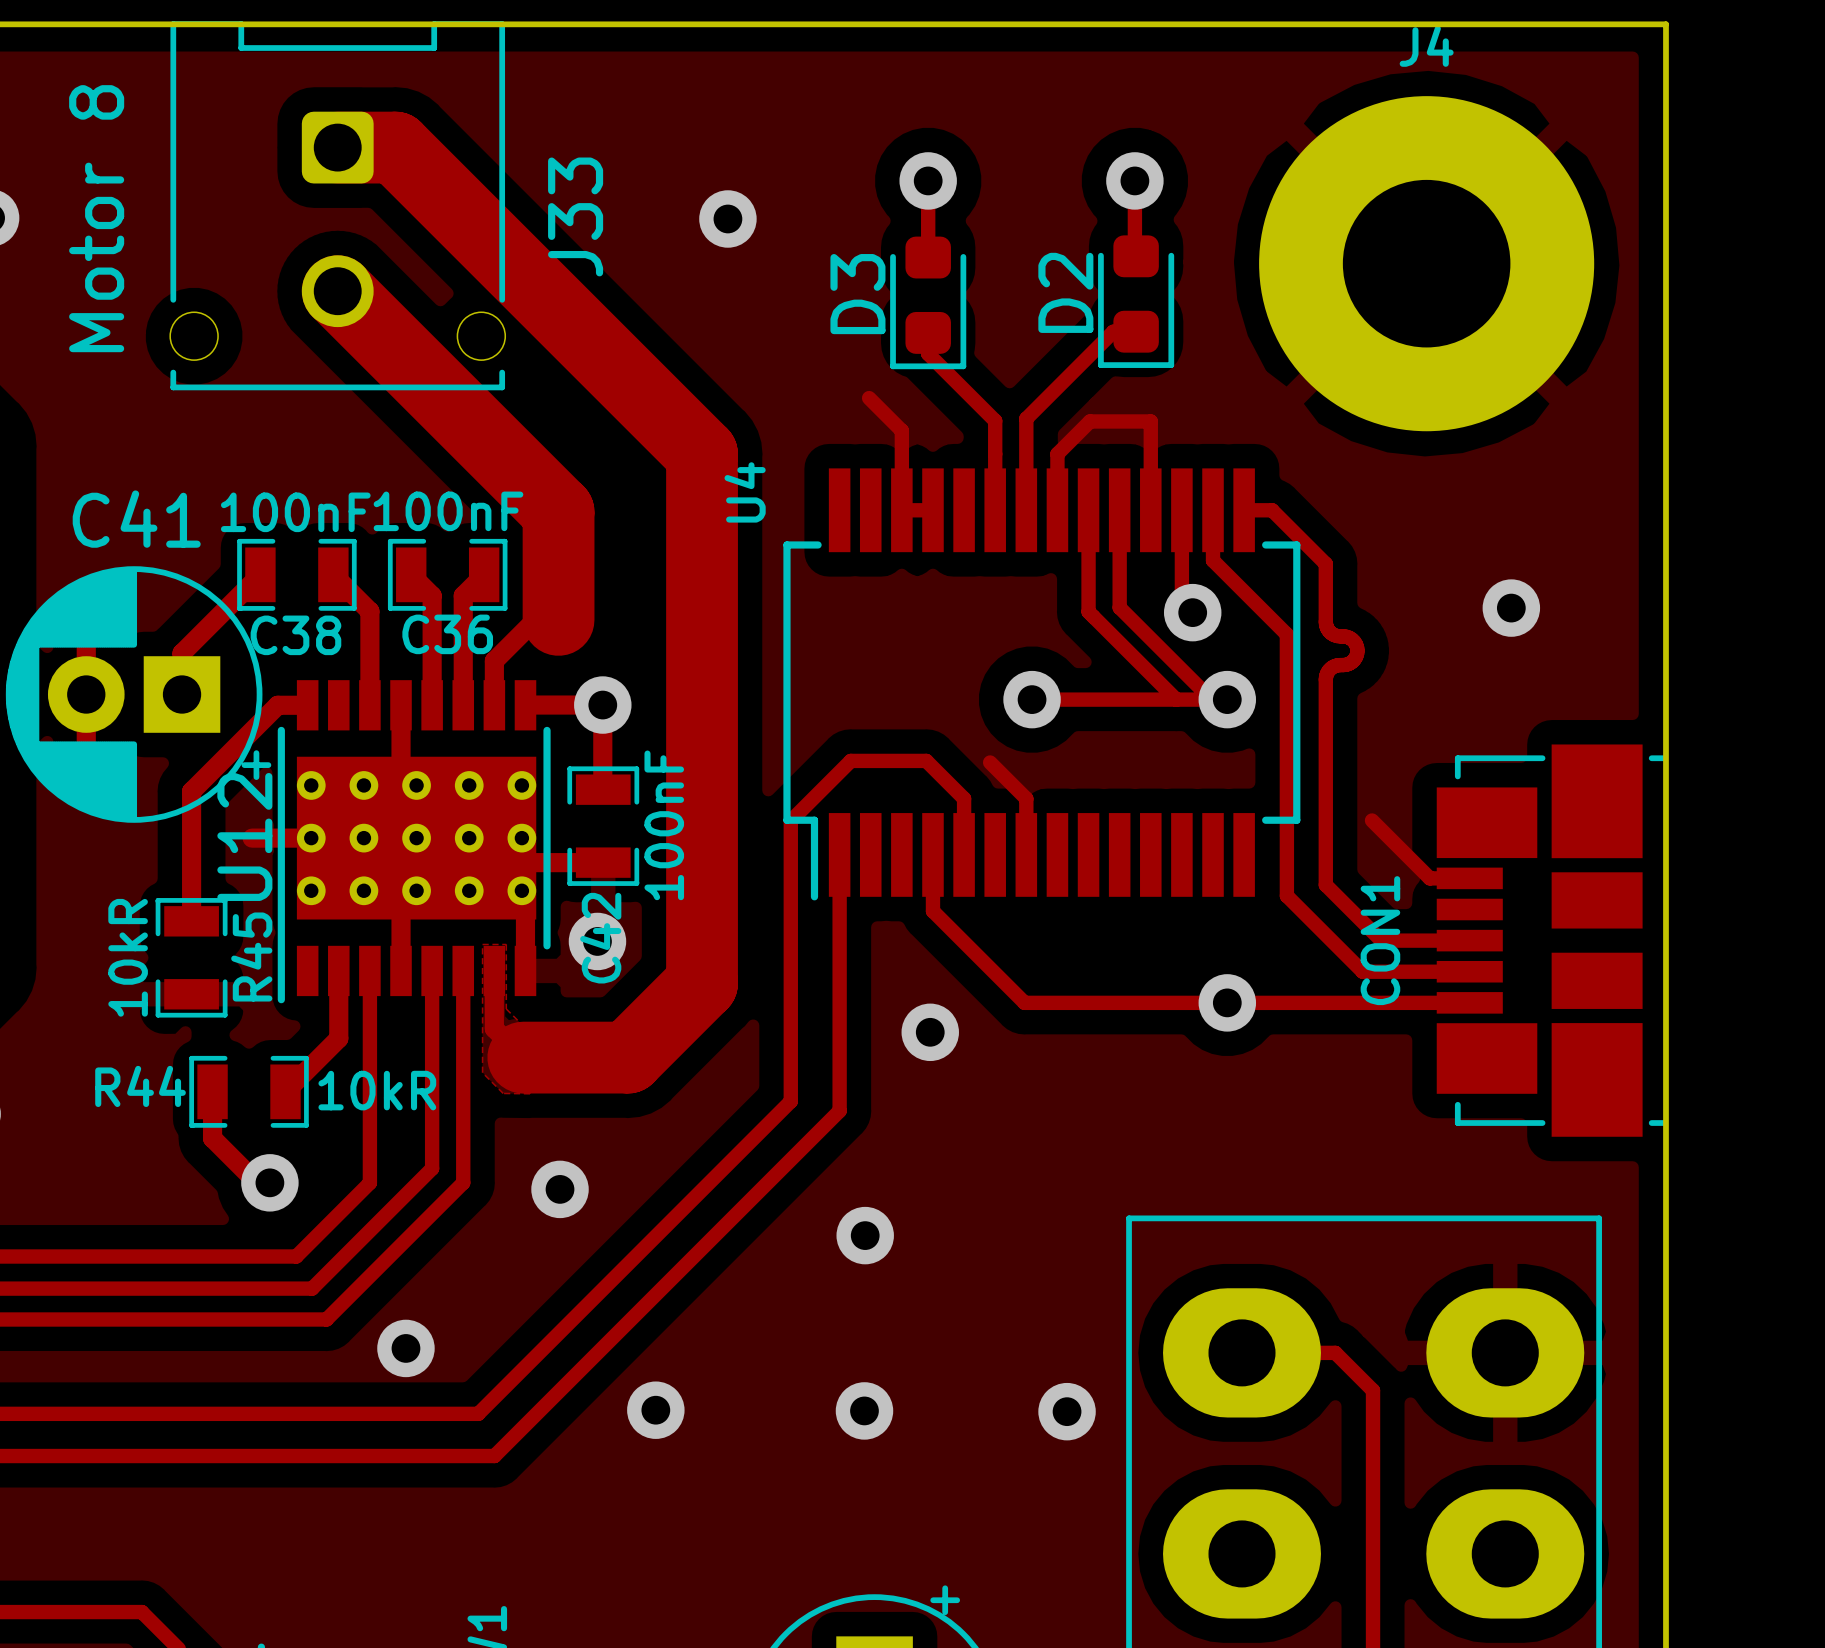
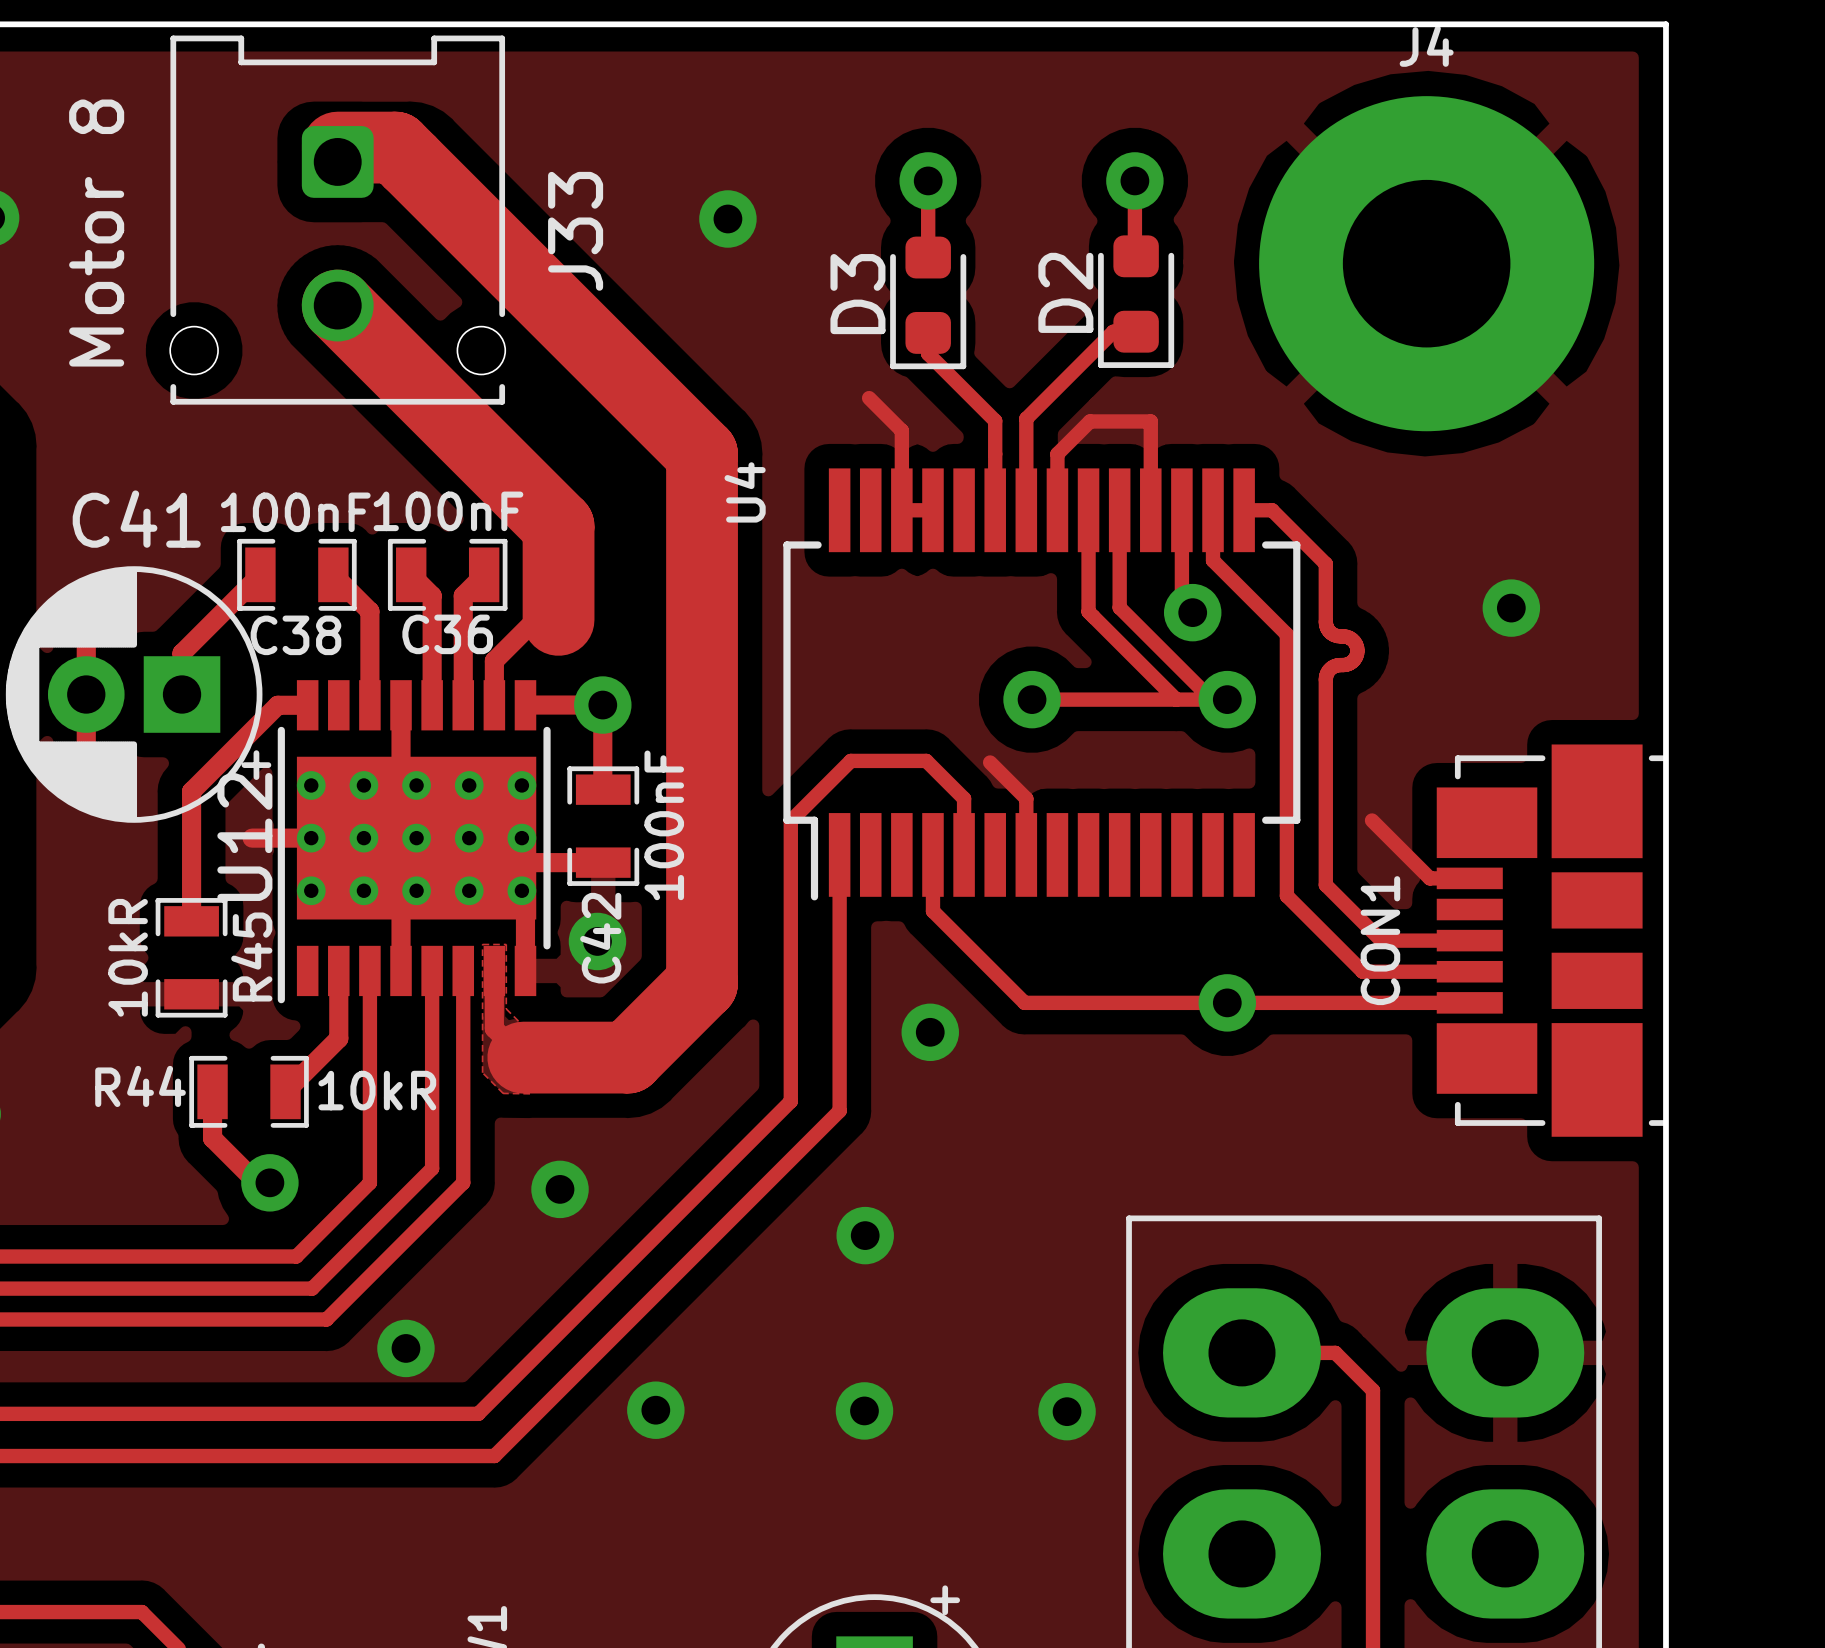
J33 position: (337, 205) -> (337, 220)
track: (337, 291) (558, 512) (558, 526) -> (337, 305) (558, 526)

